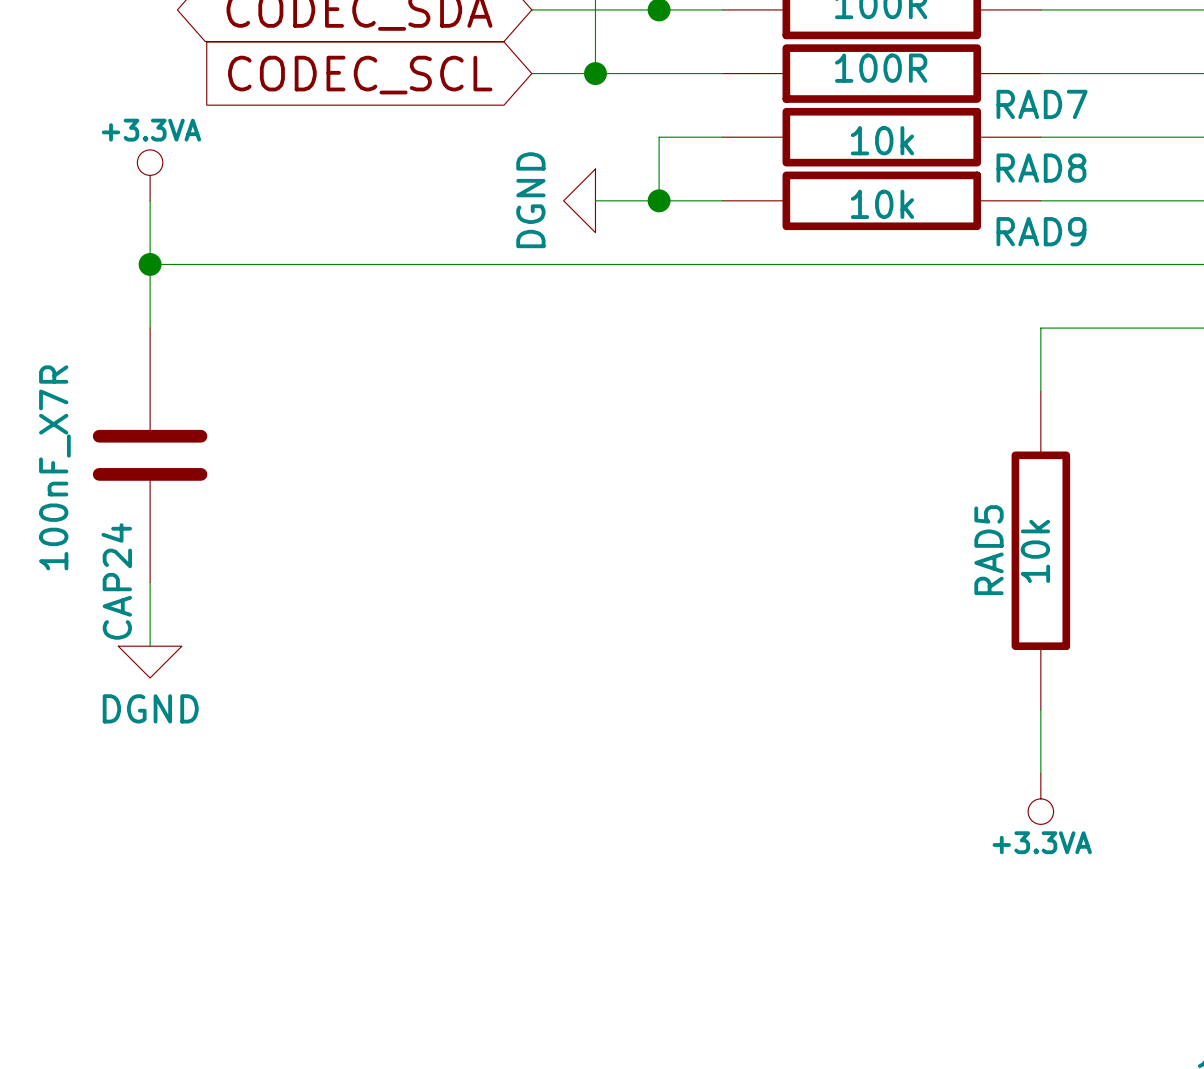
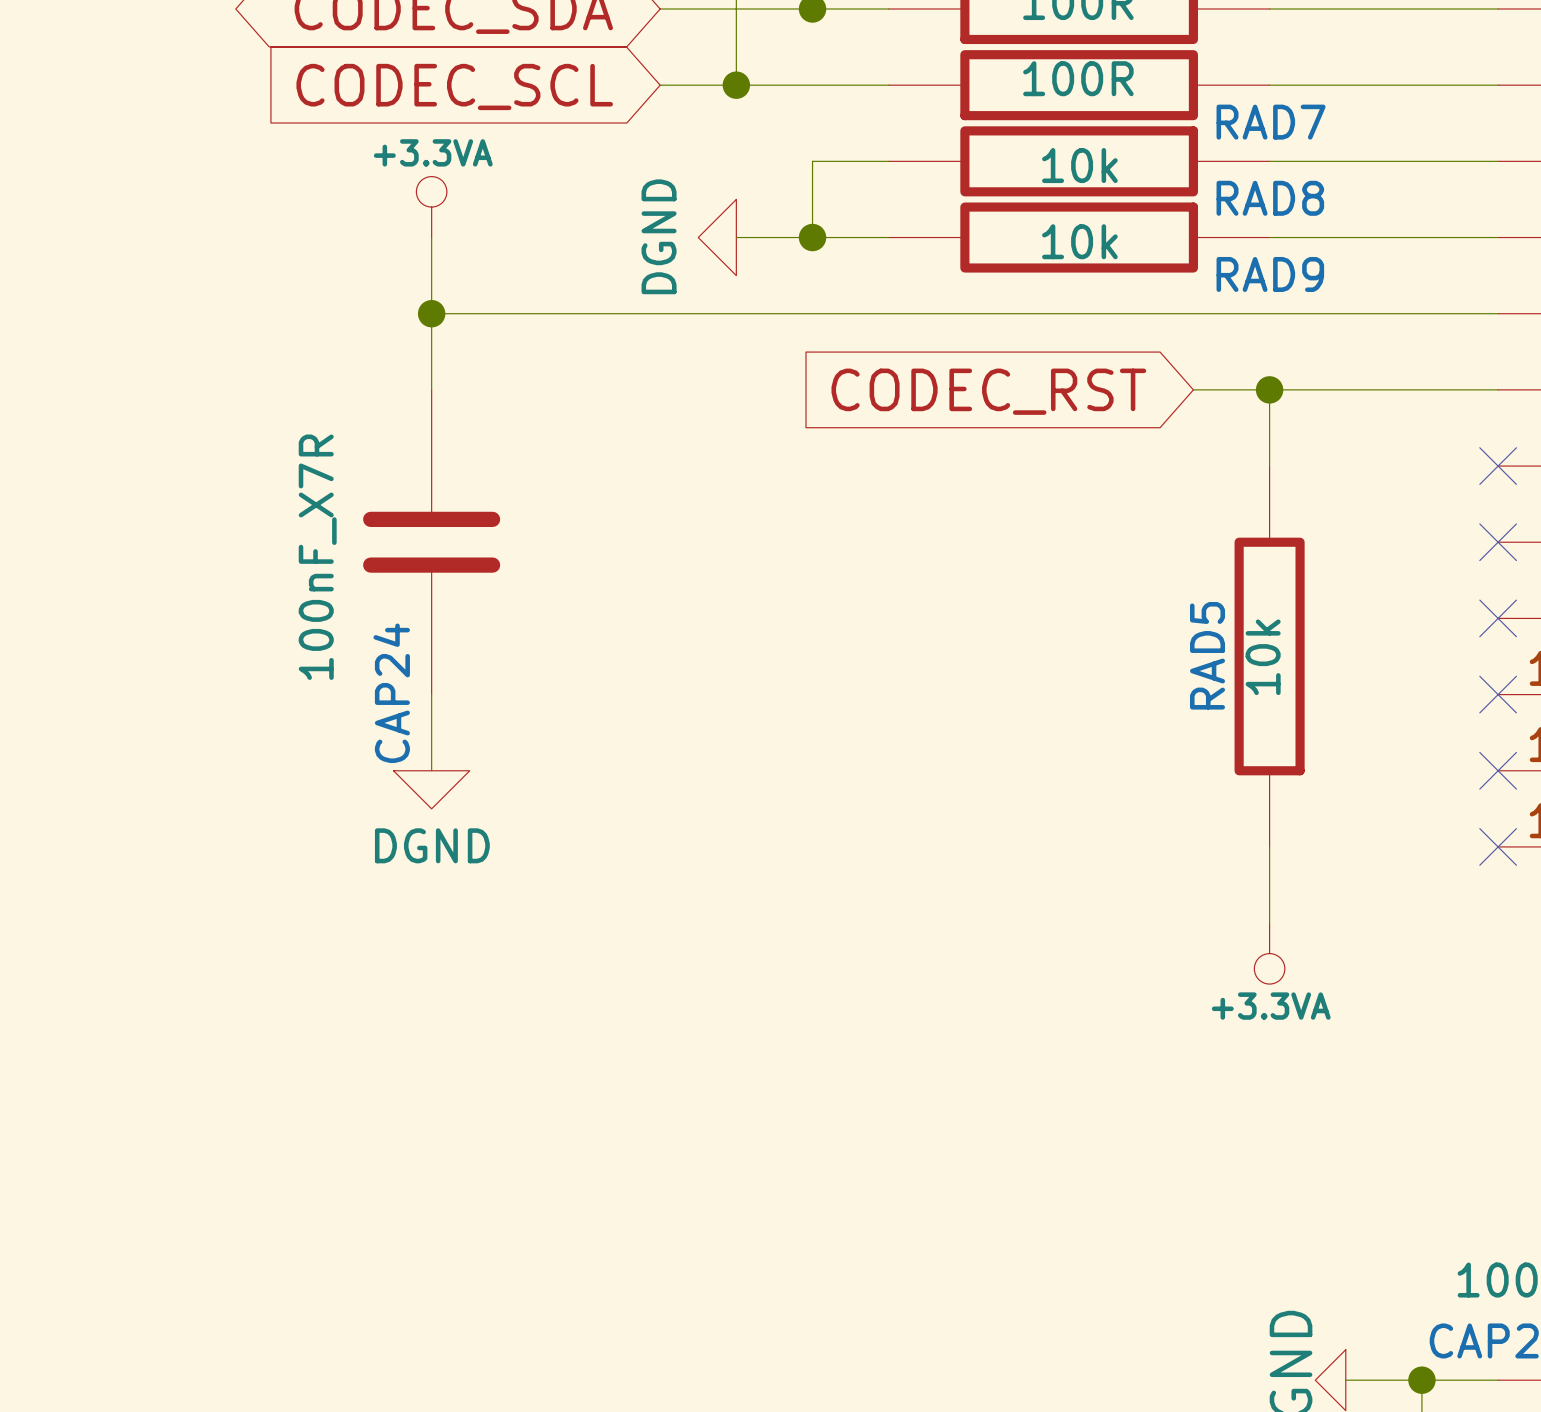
power symbol position: +3.3VA (150, 175) -> +3.3VA (431, 207)
wire: (150, 200) (150, 328) -> (431, 237) (431, 389)
wire: (150, 264) (340, 264) -> none
junction: (150, 264) -> none
junction: none -> (431, 313)
wire: none -> (1193, 389) (1269, 389)
junction: none -> (1269, 389)
global label: none -> CODEC_RST (988, 391)
CAP24 position: (150, 455) -> (431, 542)
wire: (150, 582) (150, 646) -> (431, 694) (431, 770)
power symbol position: DGND (150, 662) -> DGND (431, 789)

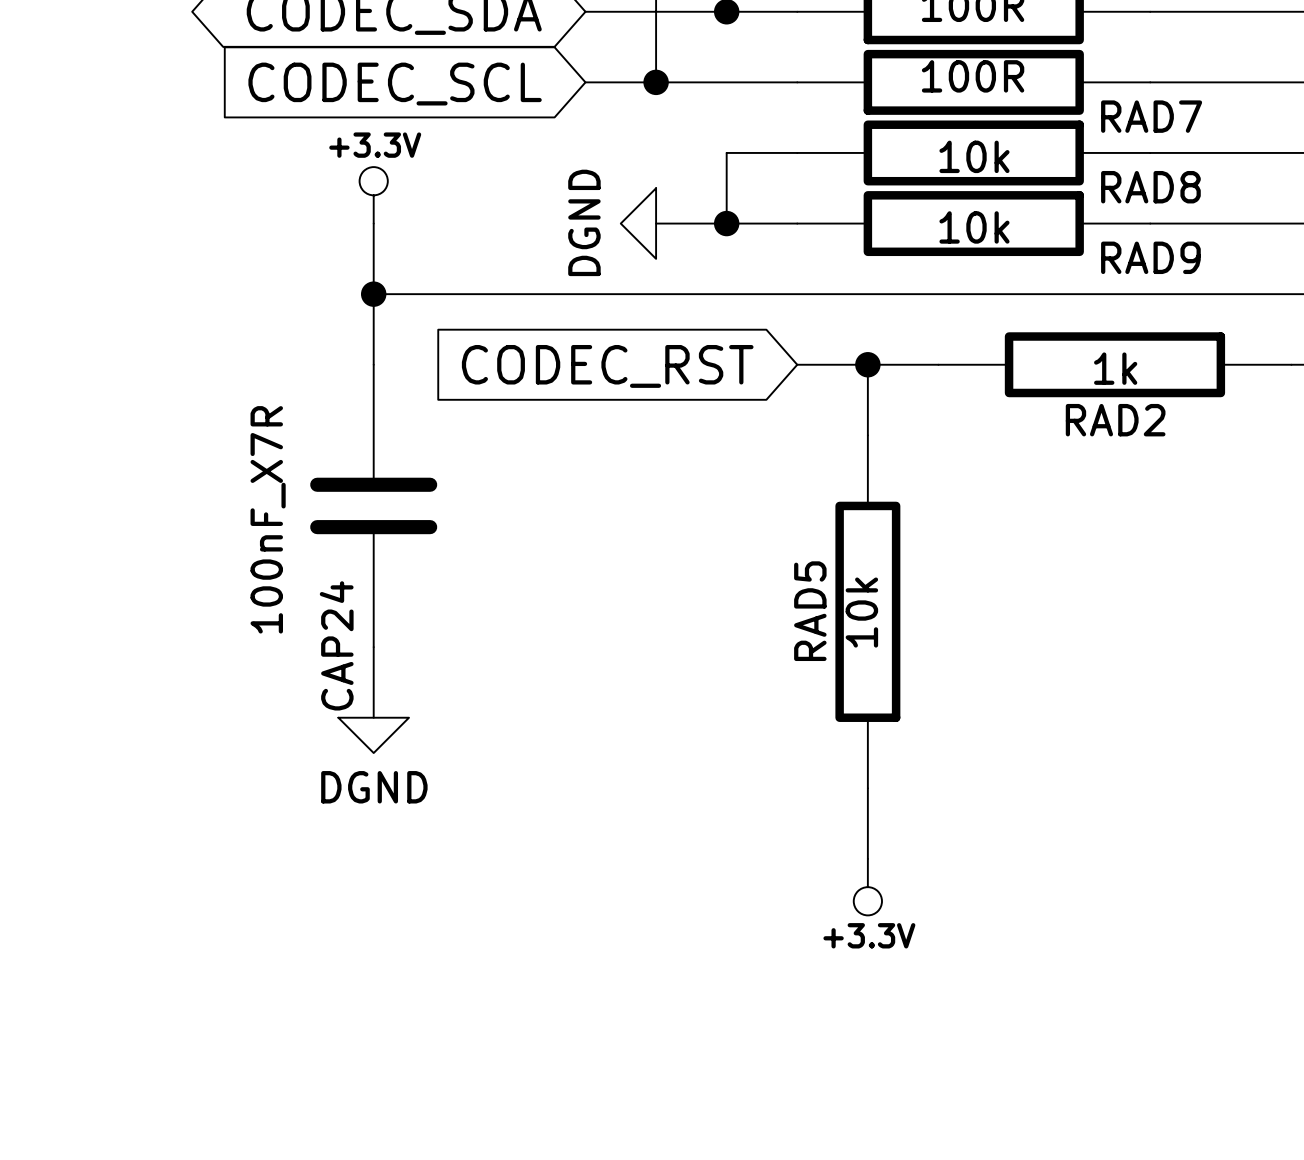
power symbol: +3.3VA (431, 207) -> +3.3V (373, 195)
wire: none -> (797, 364) (938, 364)
junction: none -> (867, 364)
wire: (1193, 389) (1421, 389) -> none
RAD2: none -> 1k (1114, 364)
wire: (1269, 389) (1269, 466) -> (867, 364) (867, 435)
junction: (1269, 389) -> none
global label position: CODEC_RST (988, 391) -> CODEC_RST (607, 366)
RAD5 position: (1269, 656) -> (867, 611)
wire: (1269, 846) (1269, 923) -> (867, 788) (867, 858)
power symbol: none -> +3.3V (867, 887)
power symbol: +3.3VA (1269, 953) -> none

